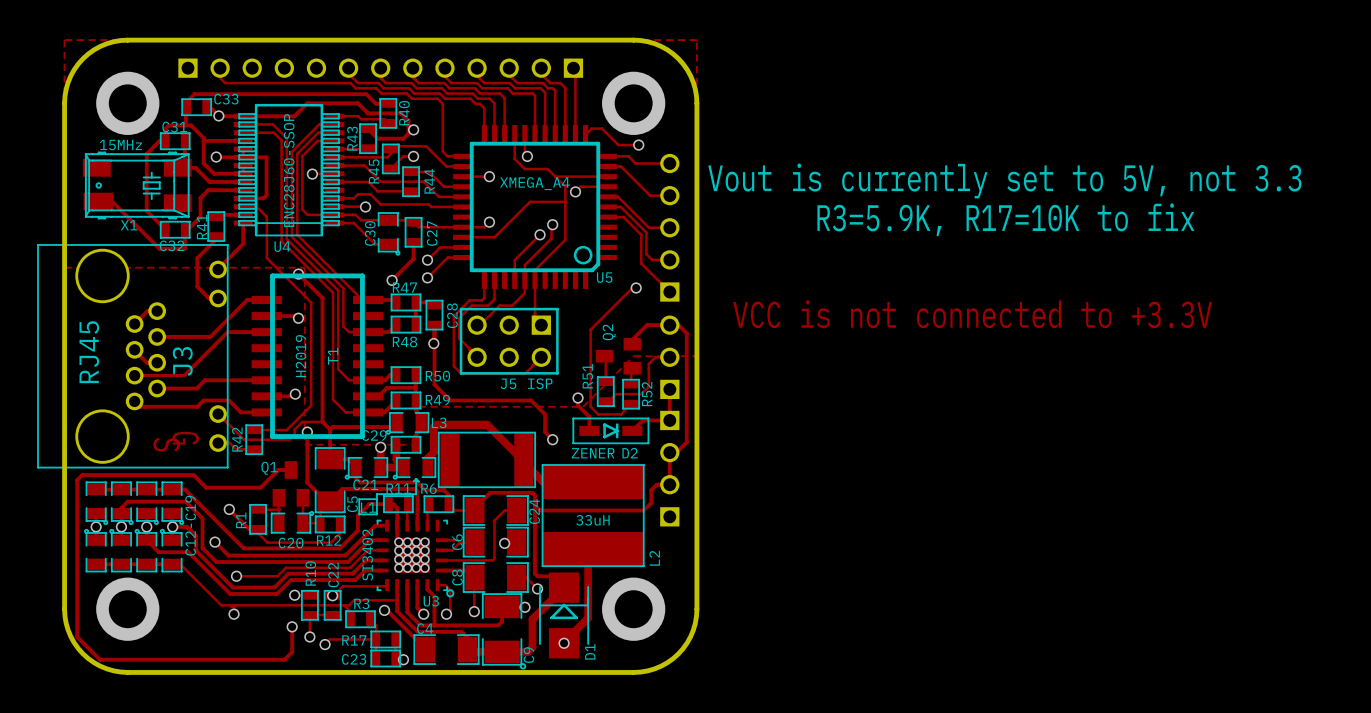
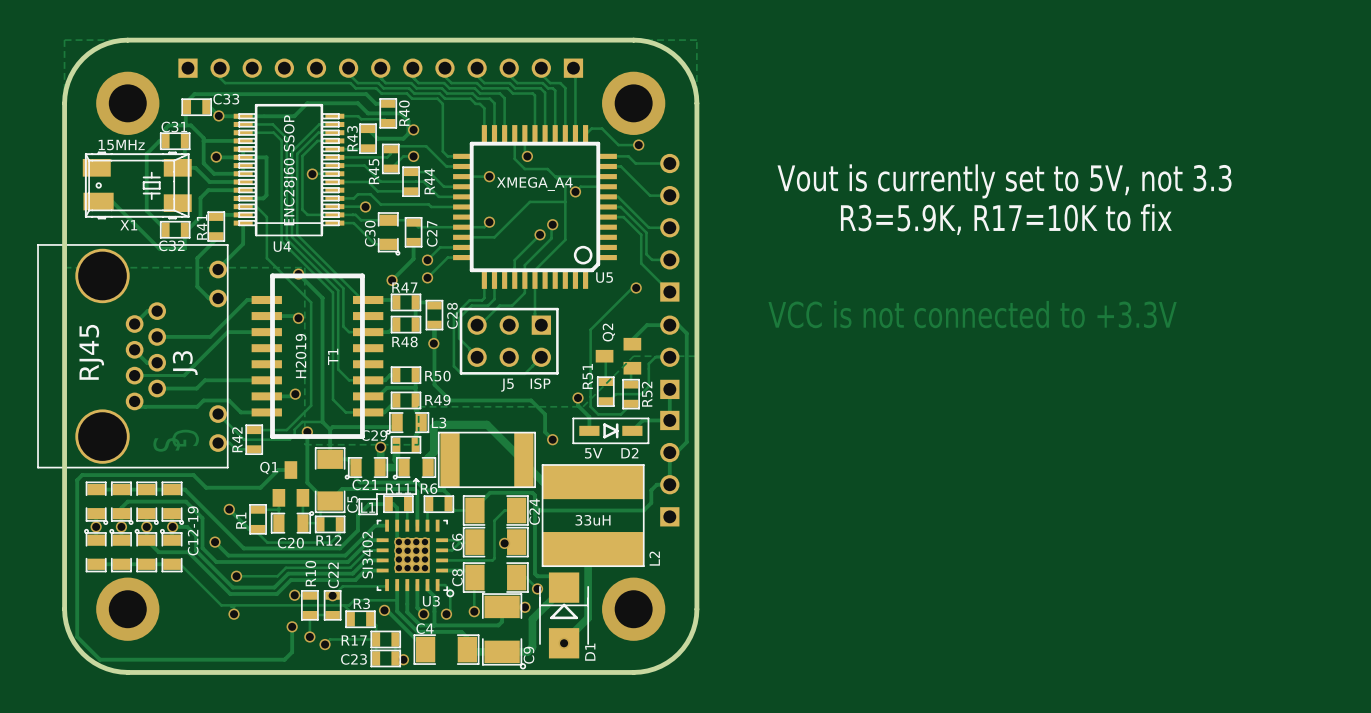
D2 value: ZENER (593, 453) -> 5V (593, 453)
C12-C19 name: C12-C19 (190, 525) -> none
text: none -> C12-19 (193, 530)

